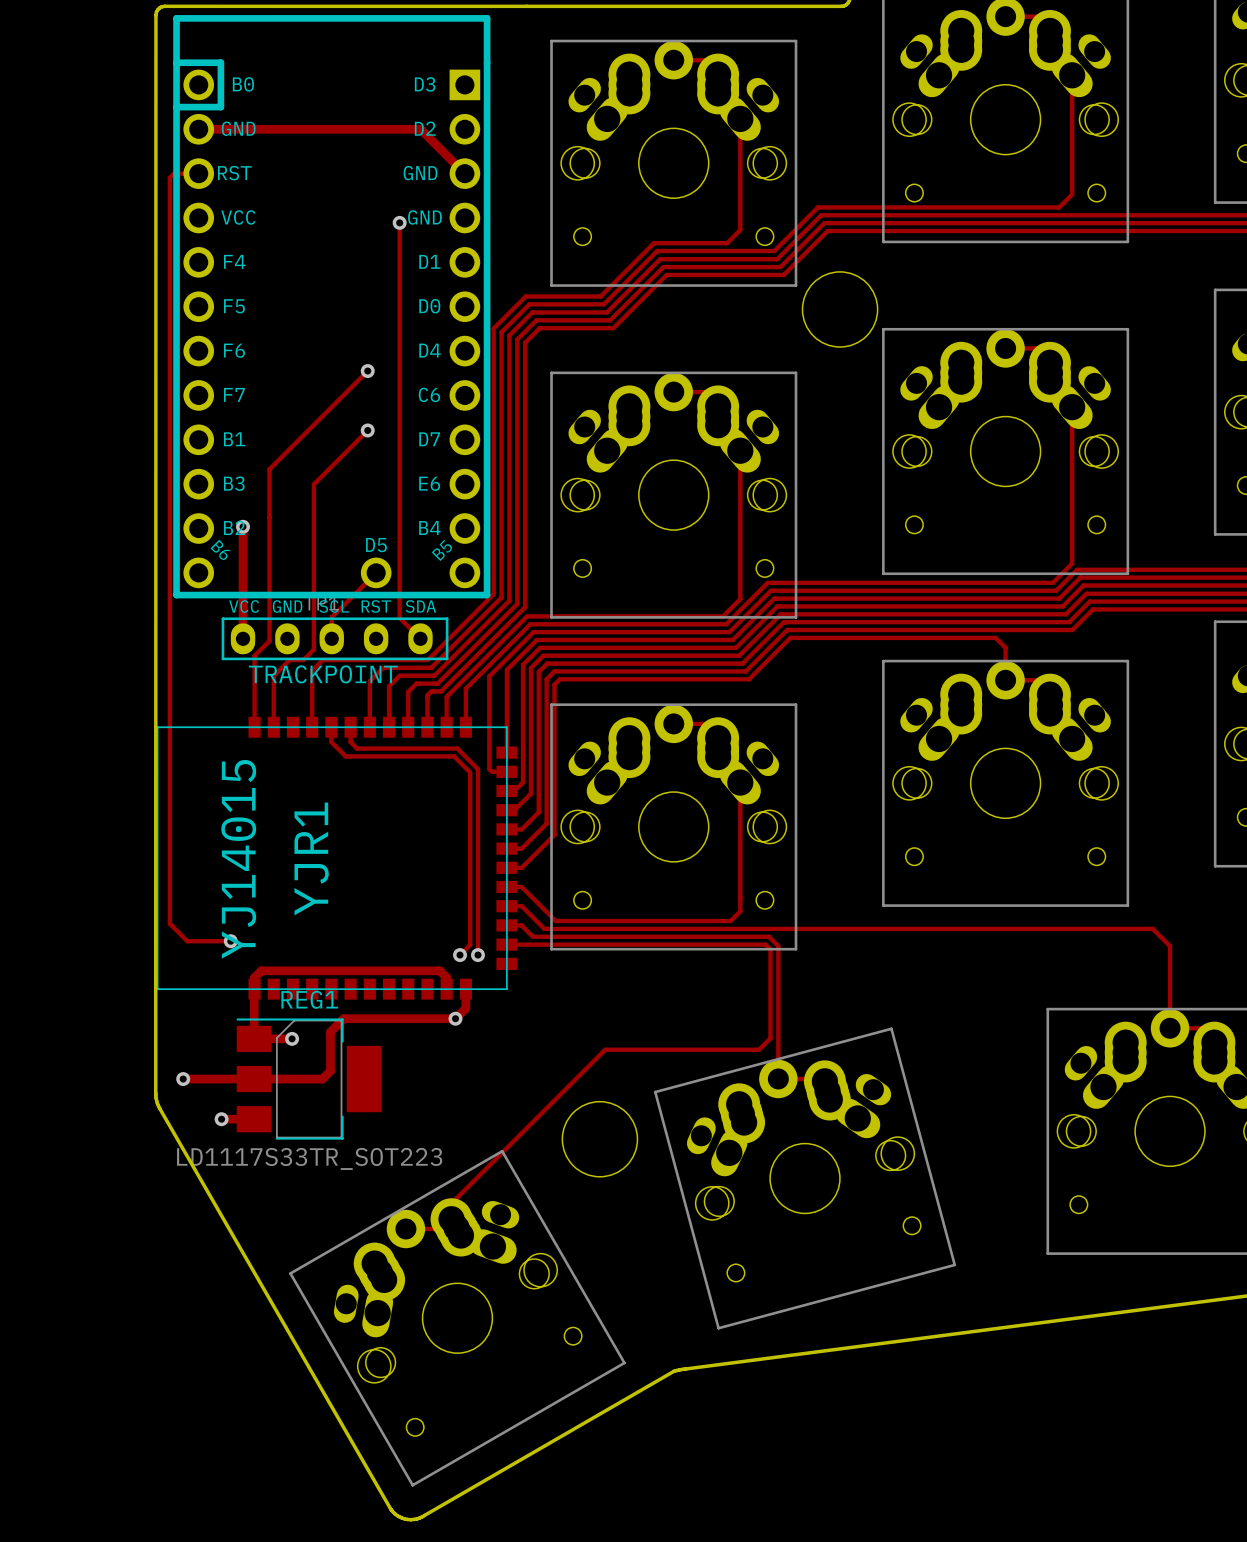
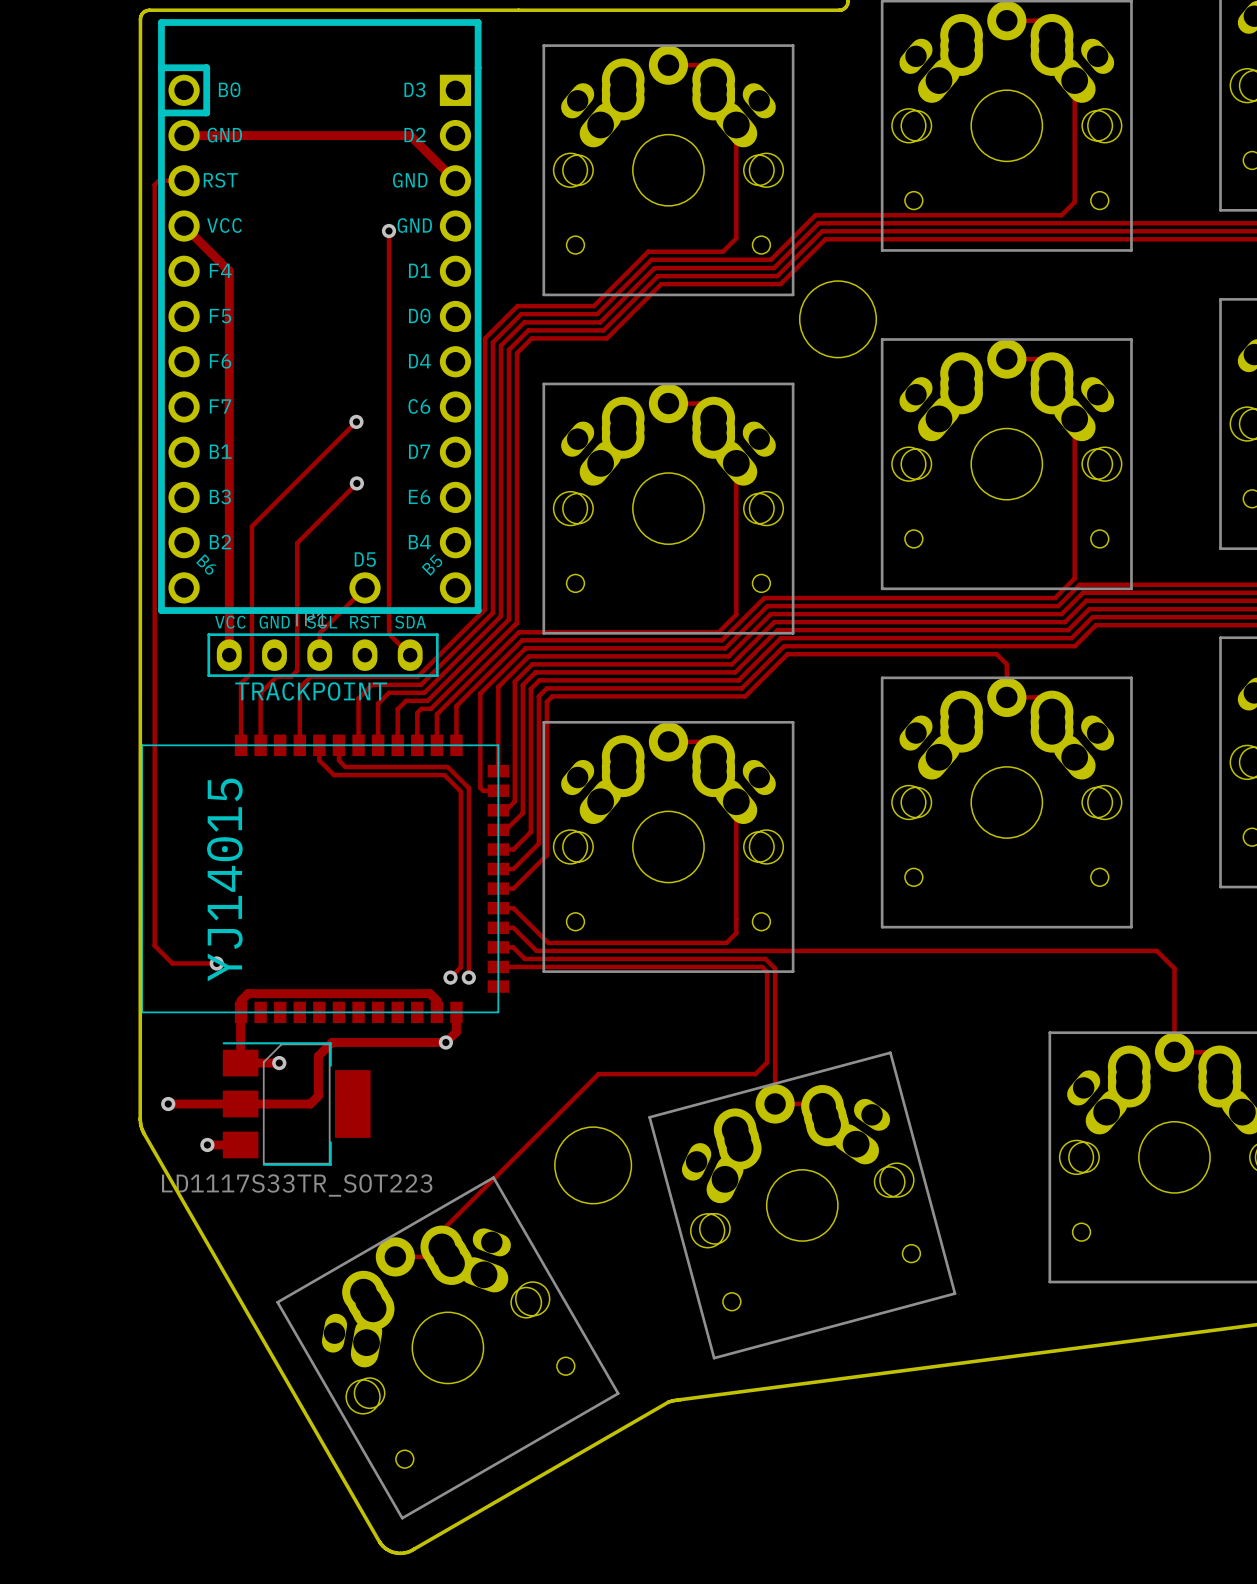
track: none -> (184, 226) (229, 271) (229, 540)
track: (367, 371) (269, 469) (269, 640) (254, 655) (254, 666) -> (356, 421) (251, 526) (251, 672) (241, 683)
via: (367, 371) -> none
via: none -> (356, 421)
track: (367, 430) (313, 484) (313, 649) (303, 660) -> (356, 483) (297, 543) (297, 670) (291, 676)
via: (367, 430) -> none
via: none -> (356, 483)
via: (243, 526) -> none
YJR1 name: YJR1 (311, 858) -> none
REG1 name: REG1 (309, 999) -> none

